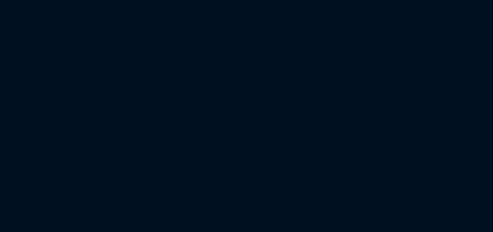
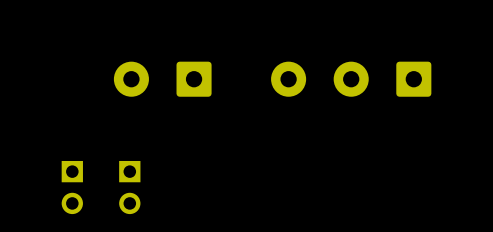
part: none -> (162, 79)
part: none -> (351, 79)
part: none -> (72, 187)
part: none -> (129, 187)

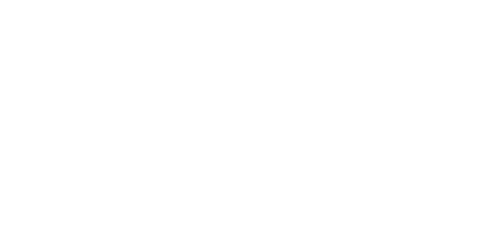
part: (162, 79) -> none
part: (351, 79) -> none
part: (72, 187) -> none
part: (129, 187) -> none

